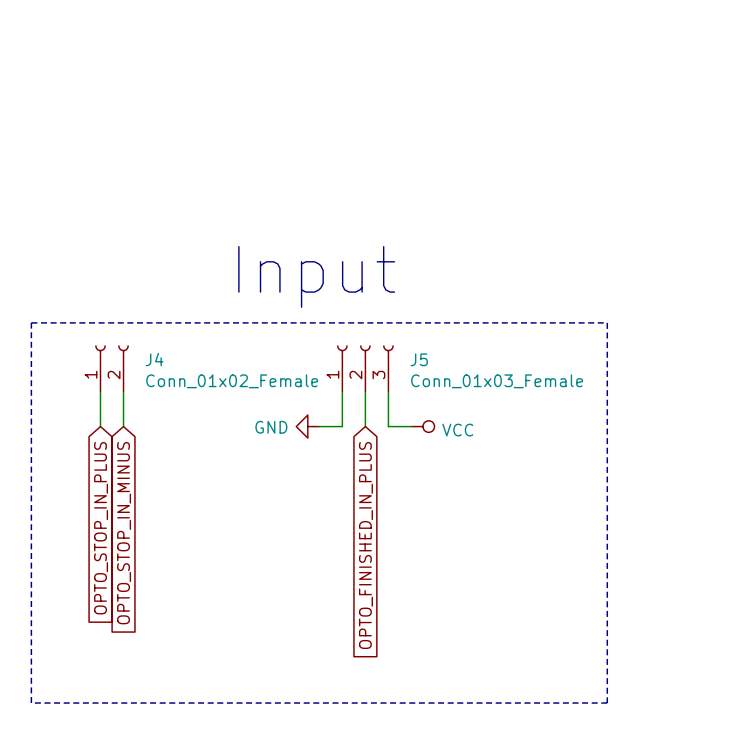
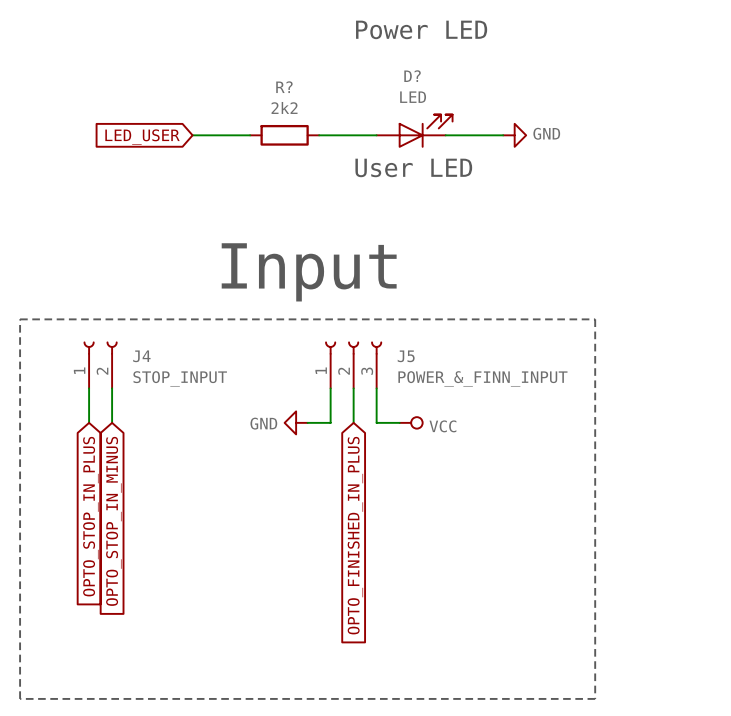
text: none -> Power LED (421, 29)
D?: none -> LED (414, 131)
wire: none -> (192, 135) (250, 135)
R?: none -> 2k2 (284, 135)
wire: none -> (319, 135) (376, 135)
wire: none -> (445, 135) (503, 135)
power symbol: none -> GND (514, 135)
global label: none -> LED_USER (142, 137)
text: none -> User LED (413, 167)
J4 value: Conn_01x02_Female (232, 381) -> STOP_INPUT (180, 378)
J5 value: Conn_01x03_Female (497, 381) -> POWER_&_FINN_INPUT (482, 378)

